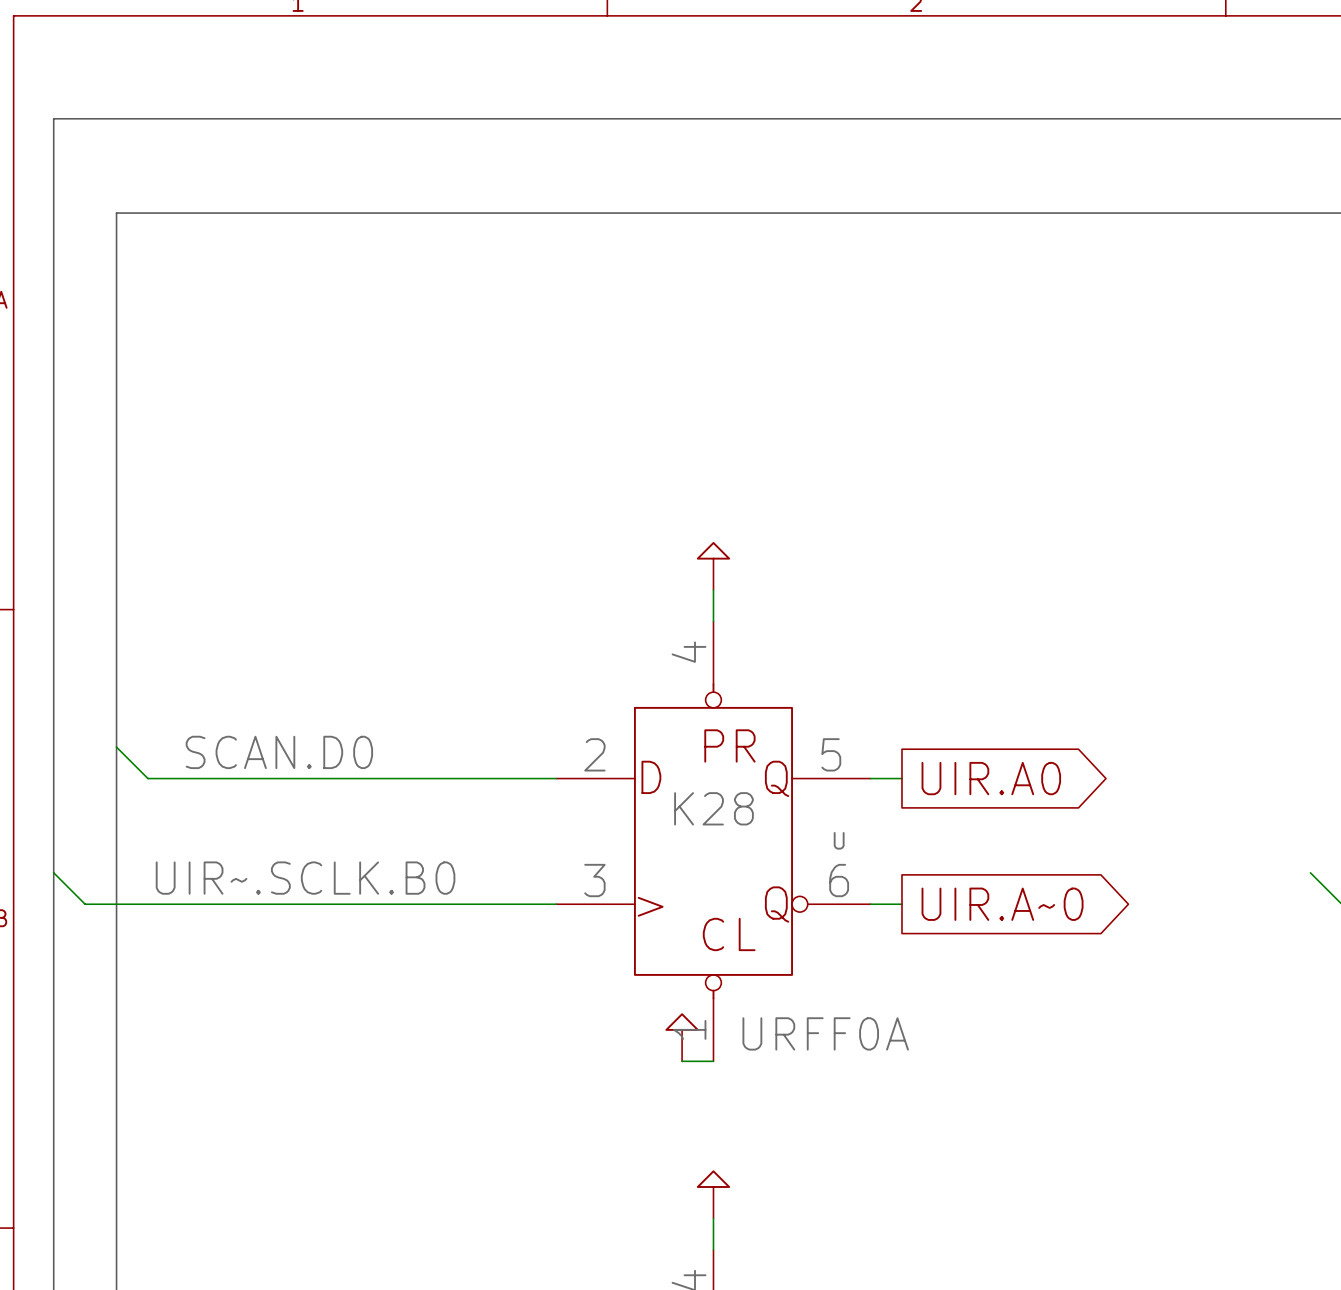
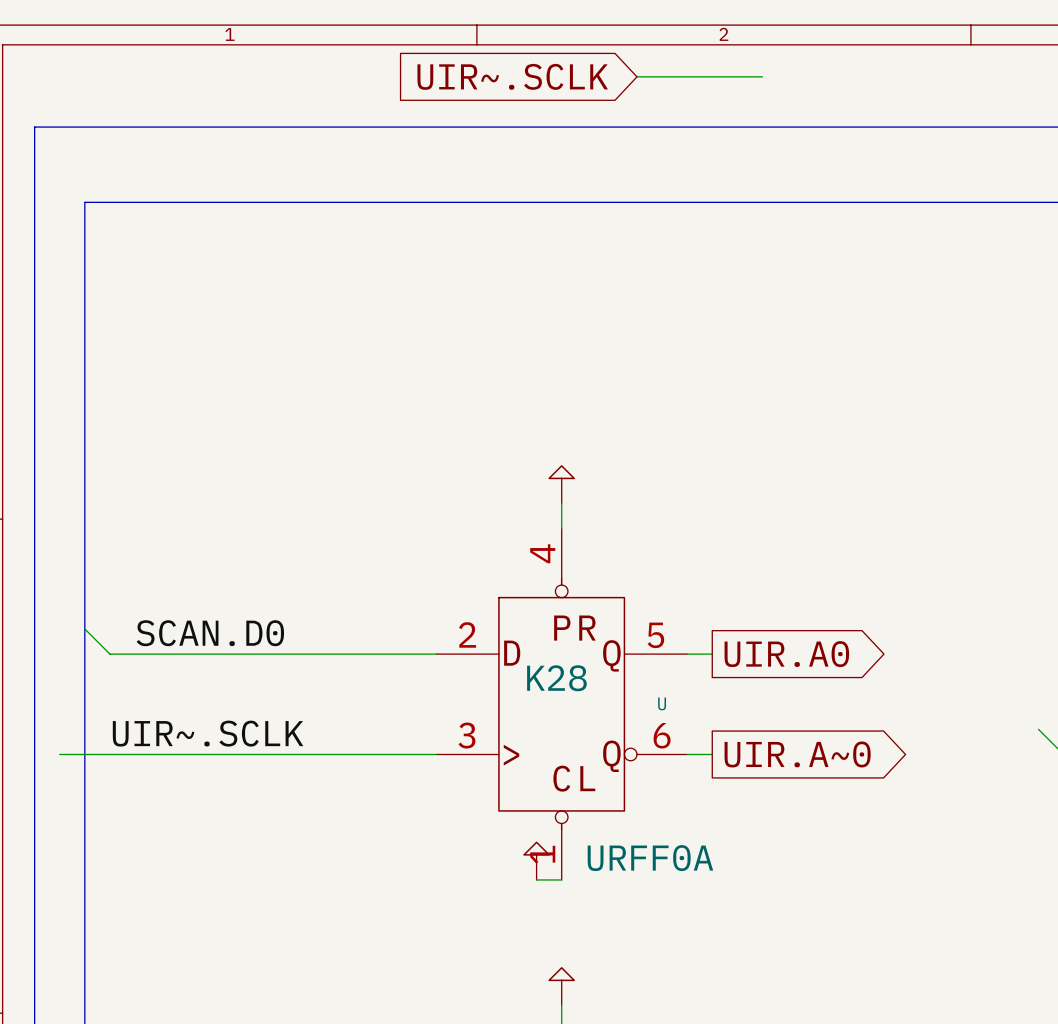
global label: none -> UIR~.SCLK (512, 76)
wire: none -> (636, 76) (762, 76)
wire: (53, 872) (85, 904) -> none
label: UIR~.SCLK.B0 (305, 878) -> UIR~.SCLK (208, 733)

